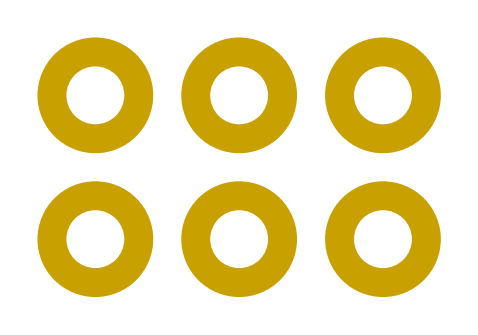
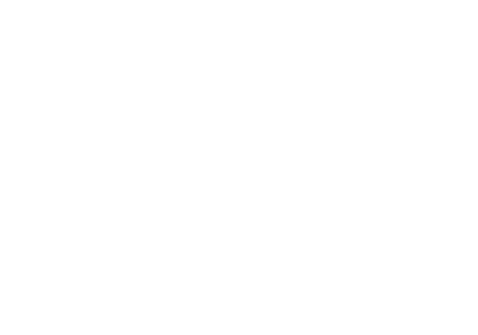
part: (95, 95) -> none
part: (239, 95) -> none
part: (382, 95) -> none
part: (95, 239) -> none
part: (239, 239) -> none
part: (382, 239) -> none

